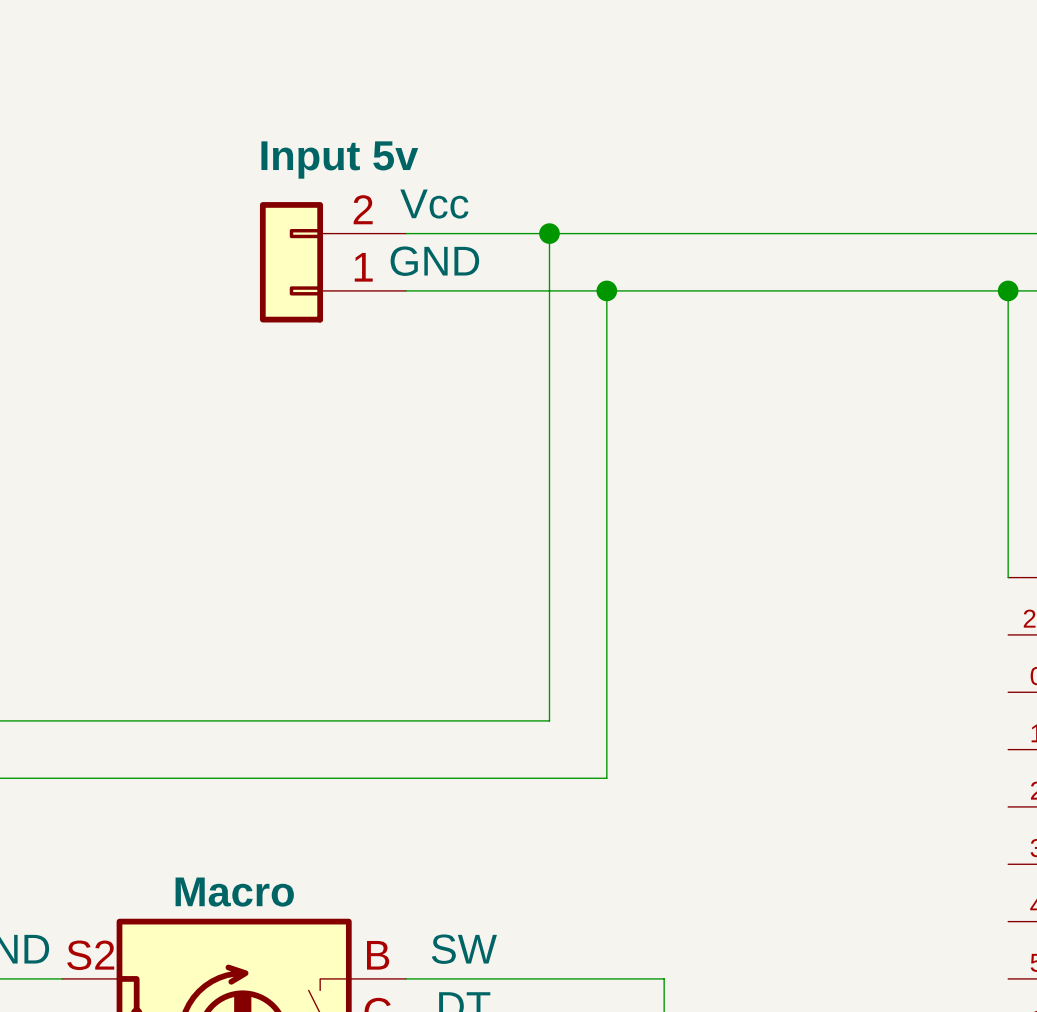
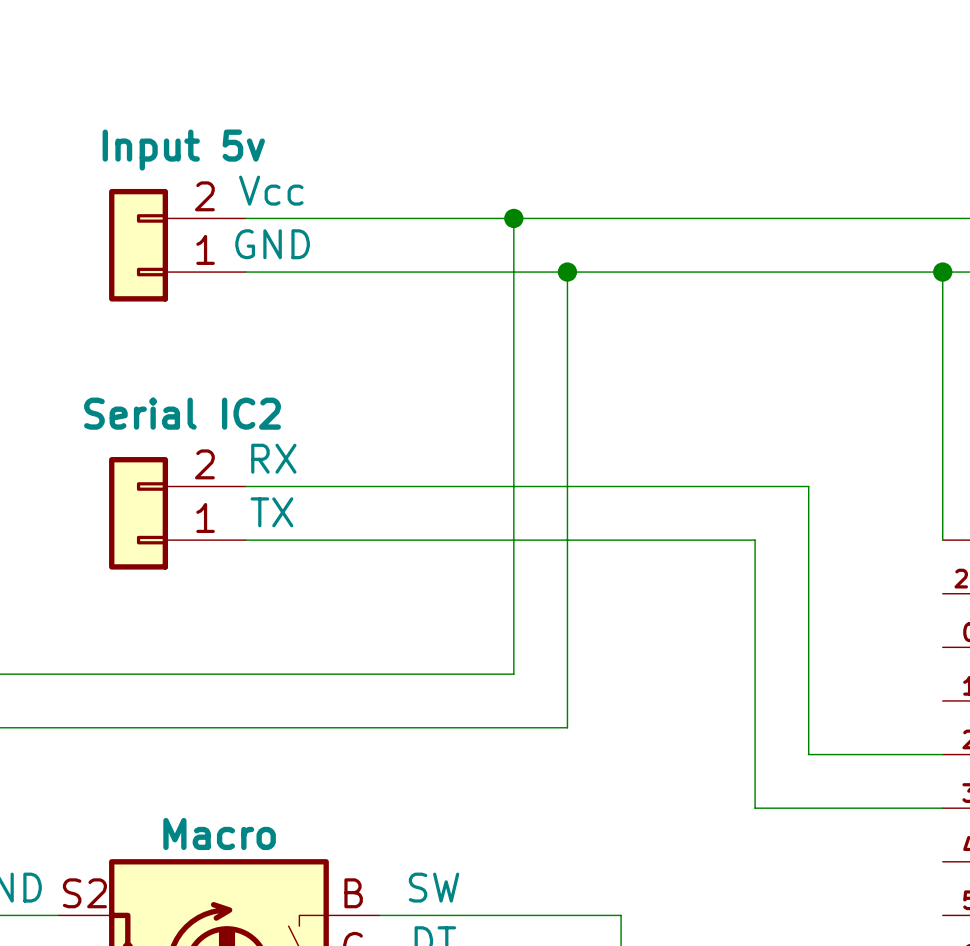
part position: (333, 262) -> (177, 245)
wire: none -> (245, 486) (808, 486) (808, 754) (942, 754)
part: none -> Serial IC2 (177, 513)
wire: none -> (245, 540) (755, 540) (755, 808) (942, 808)

